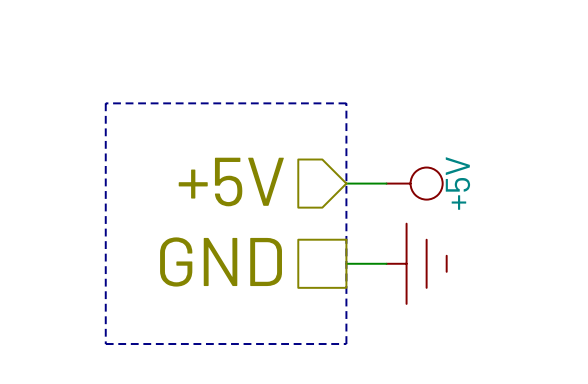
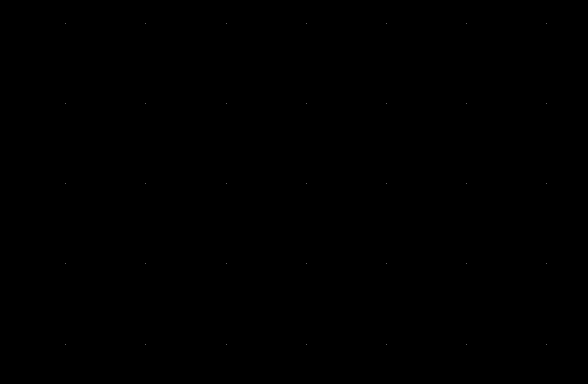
line: (105, 103) (346, 103) (346, 344) (105, 344) (105, 103) -> none
hierarchical label: +5V (231, 182) -> none
wire: (346, 183) (386, 183) -> none
power symbol: +5V (414, 183) -> none
hierarchical label: GND (221, 261) -> none
wire: (346, 263) (386, 263) -> none
power symbol: (416, 263) -> none

